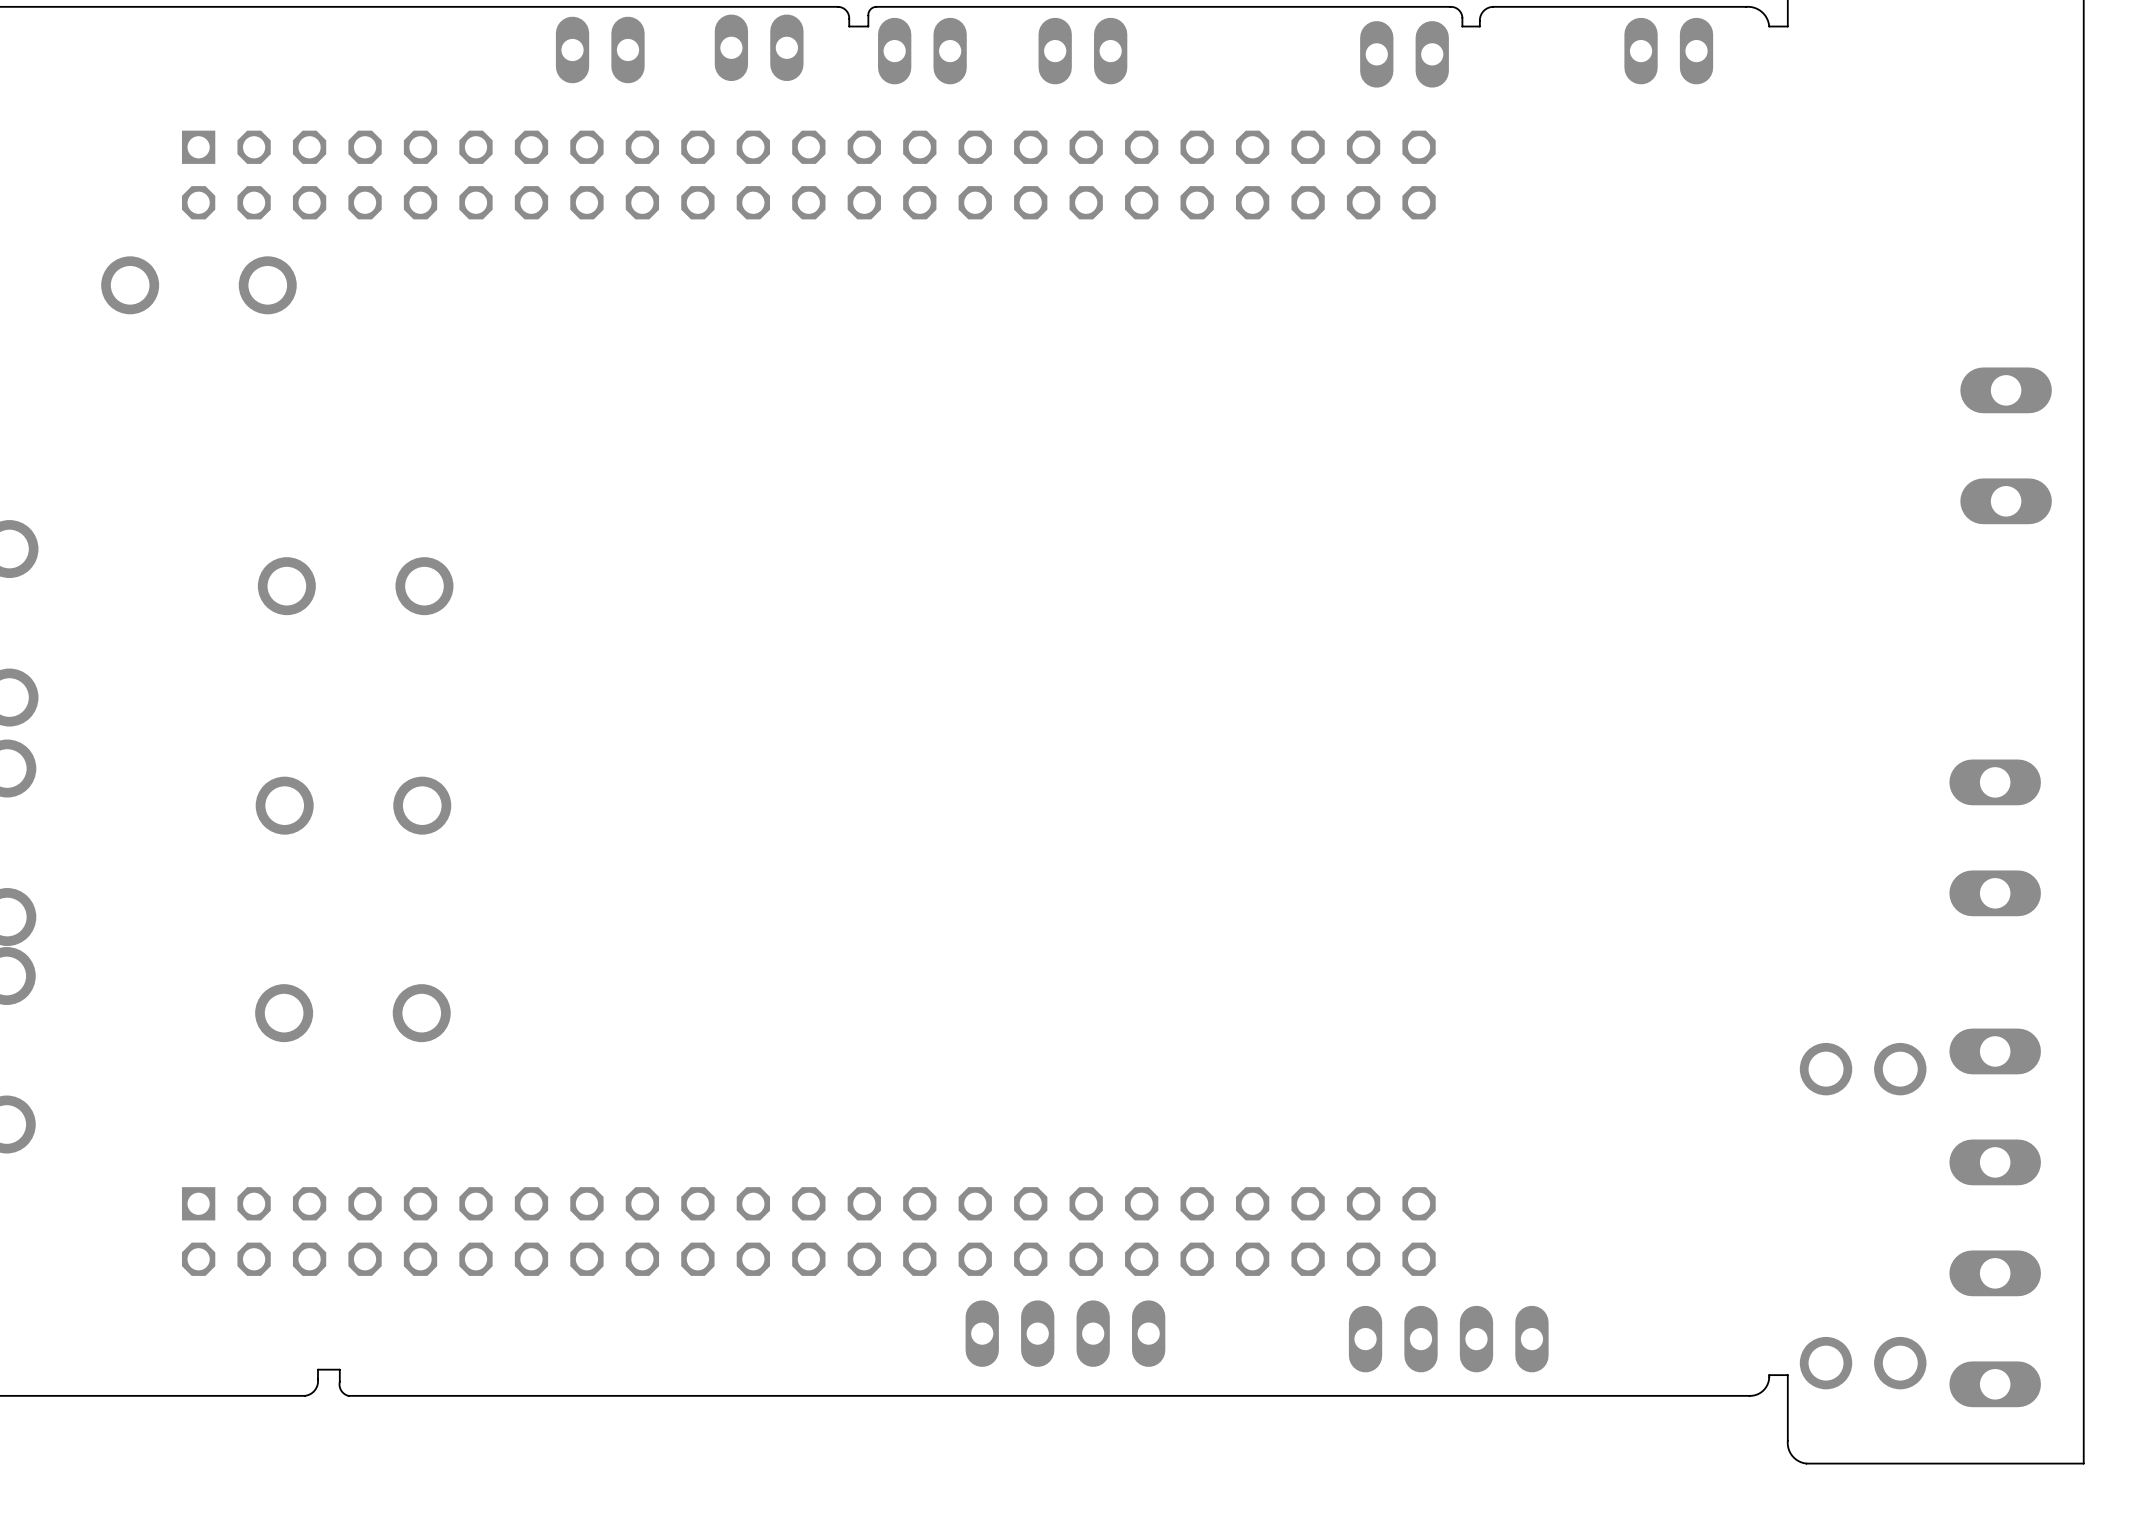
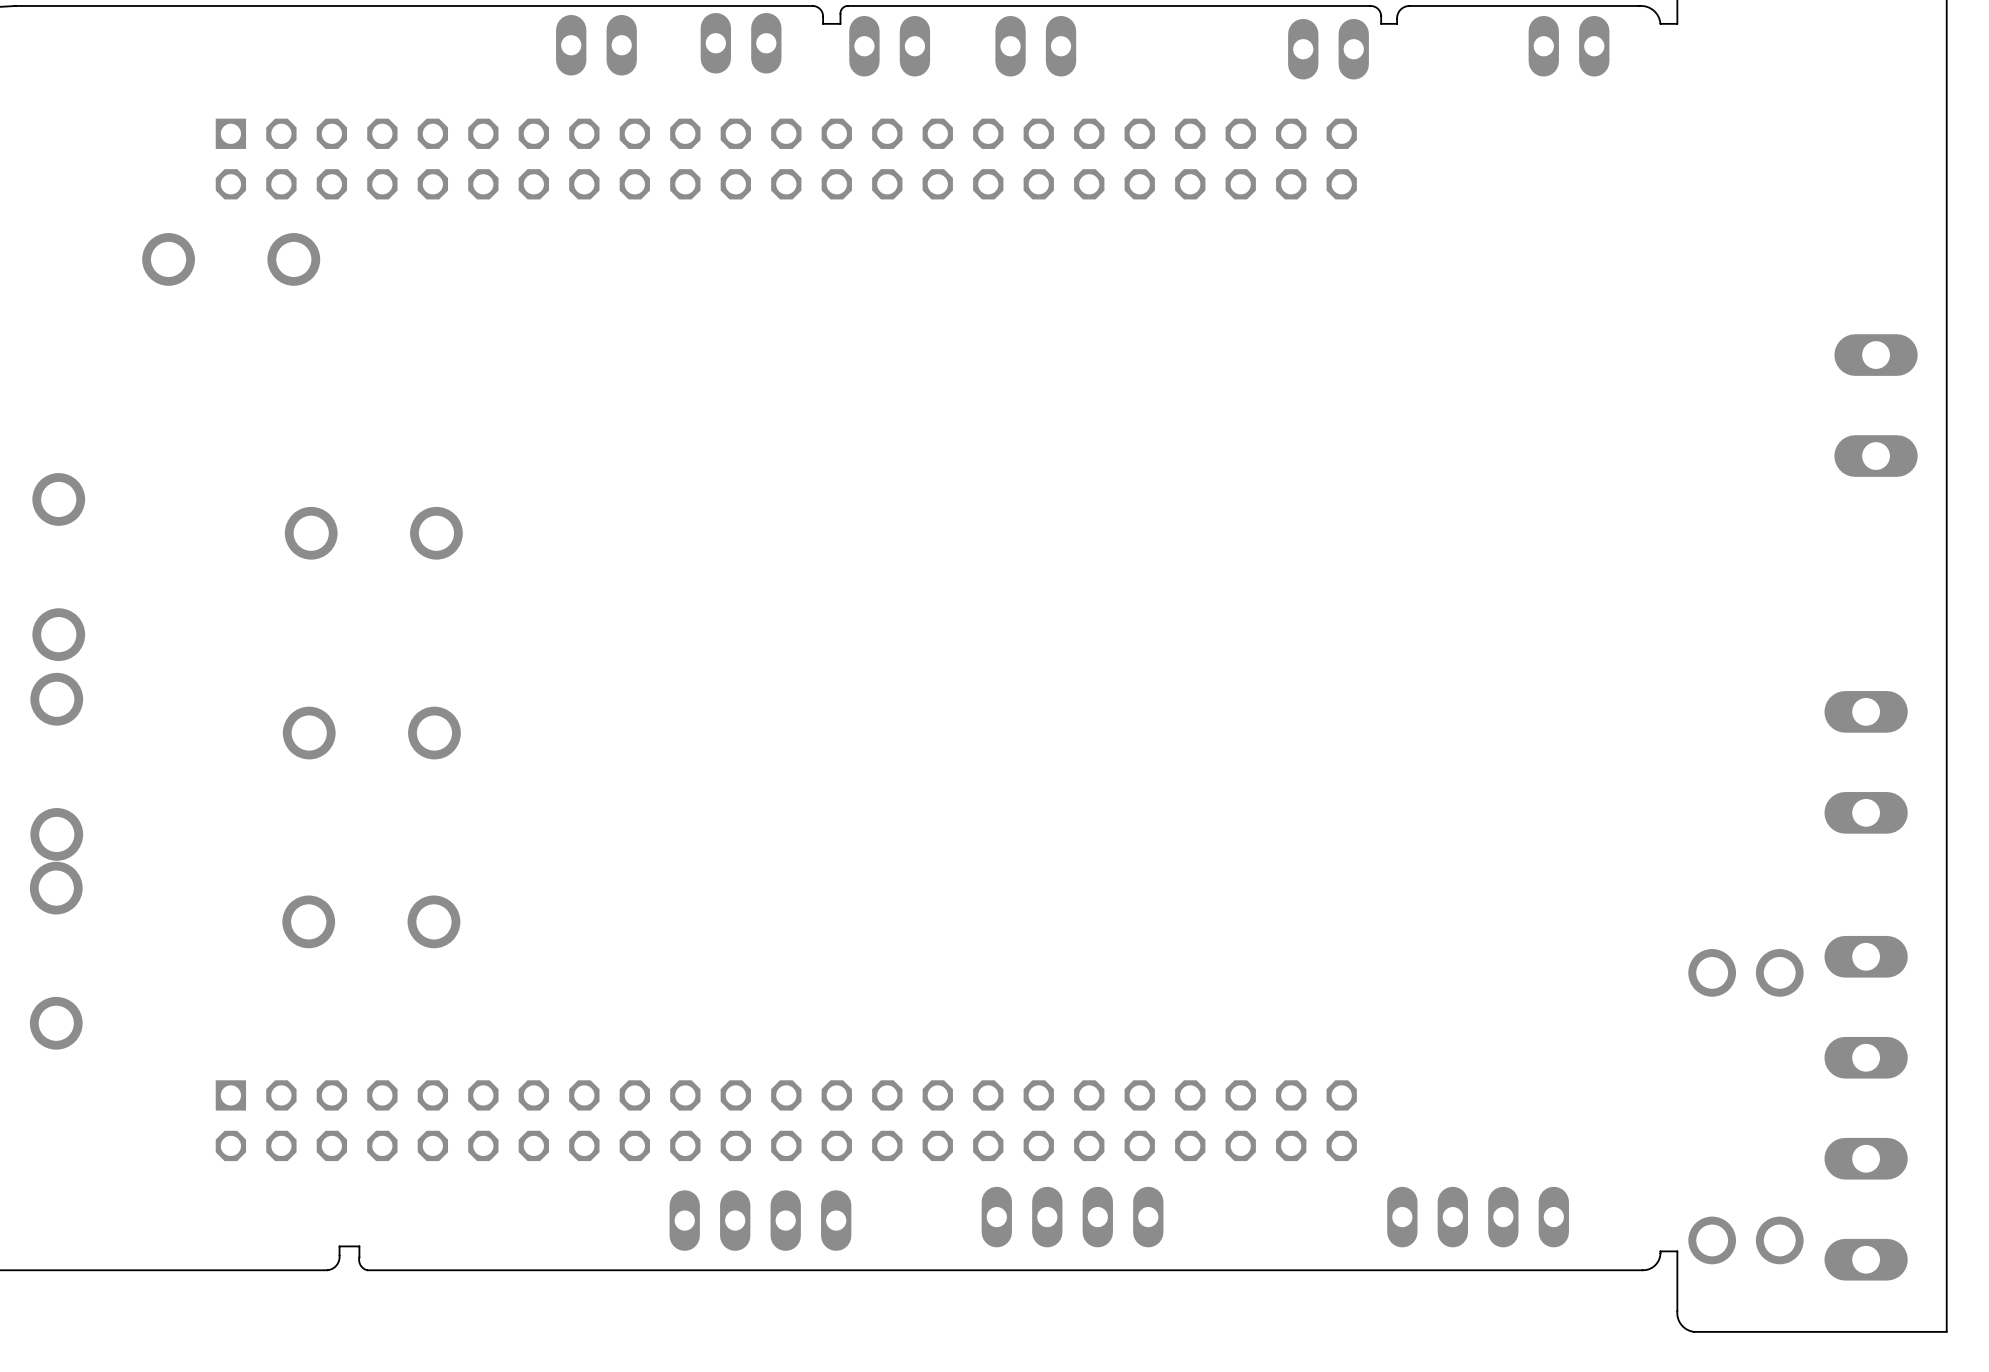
part position: (1065, 1333) -> (1072, 1217)
part position: (1448, 1339) -> (1478, 1217)
part: none -> (760, 1220)

